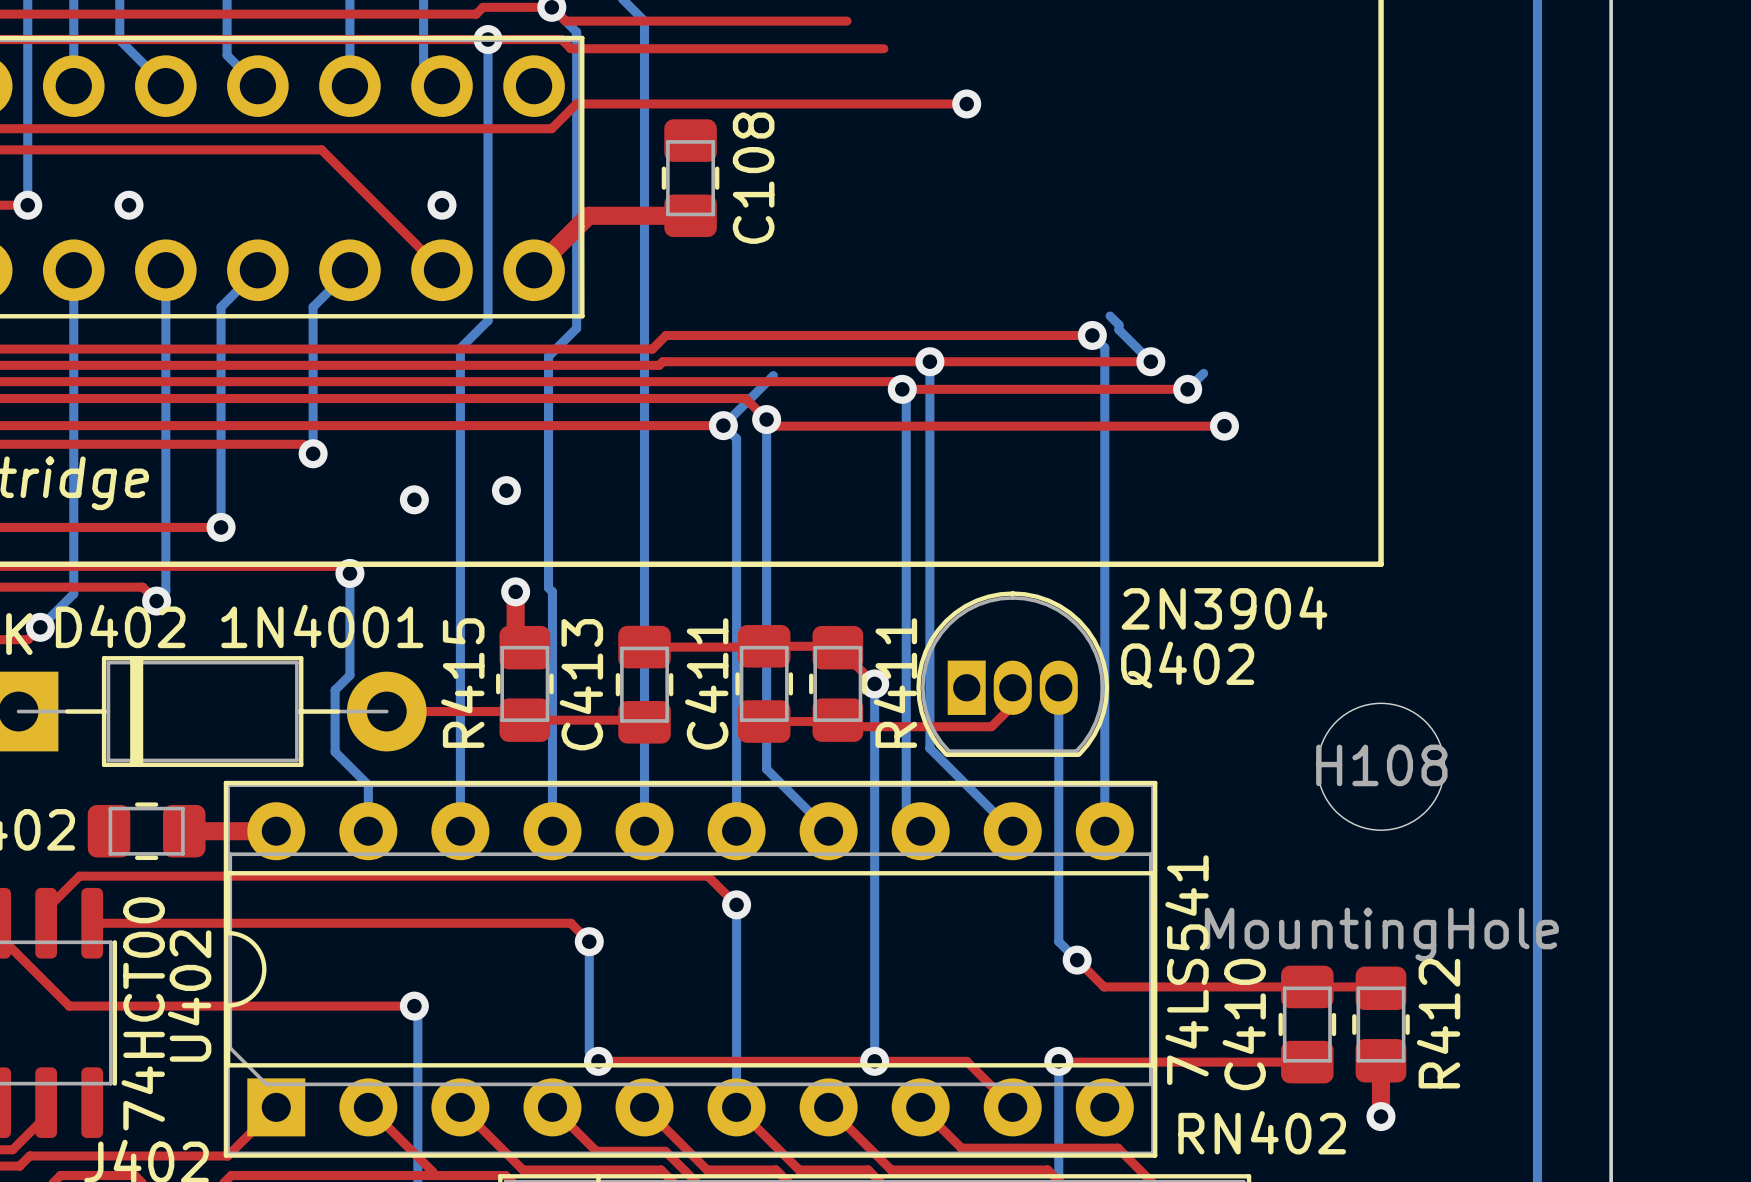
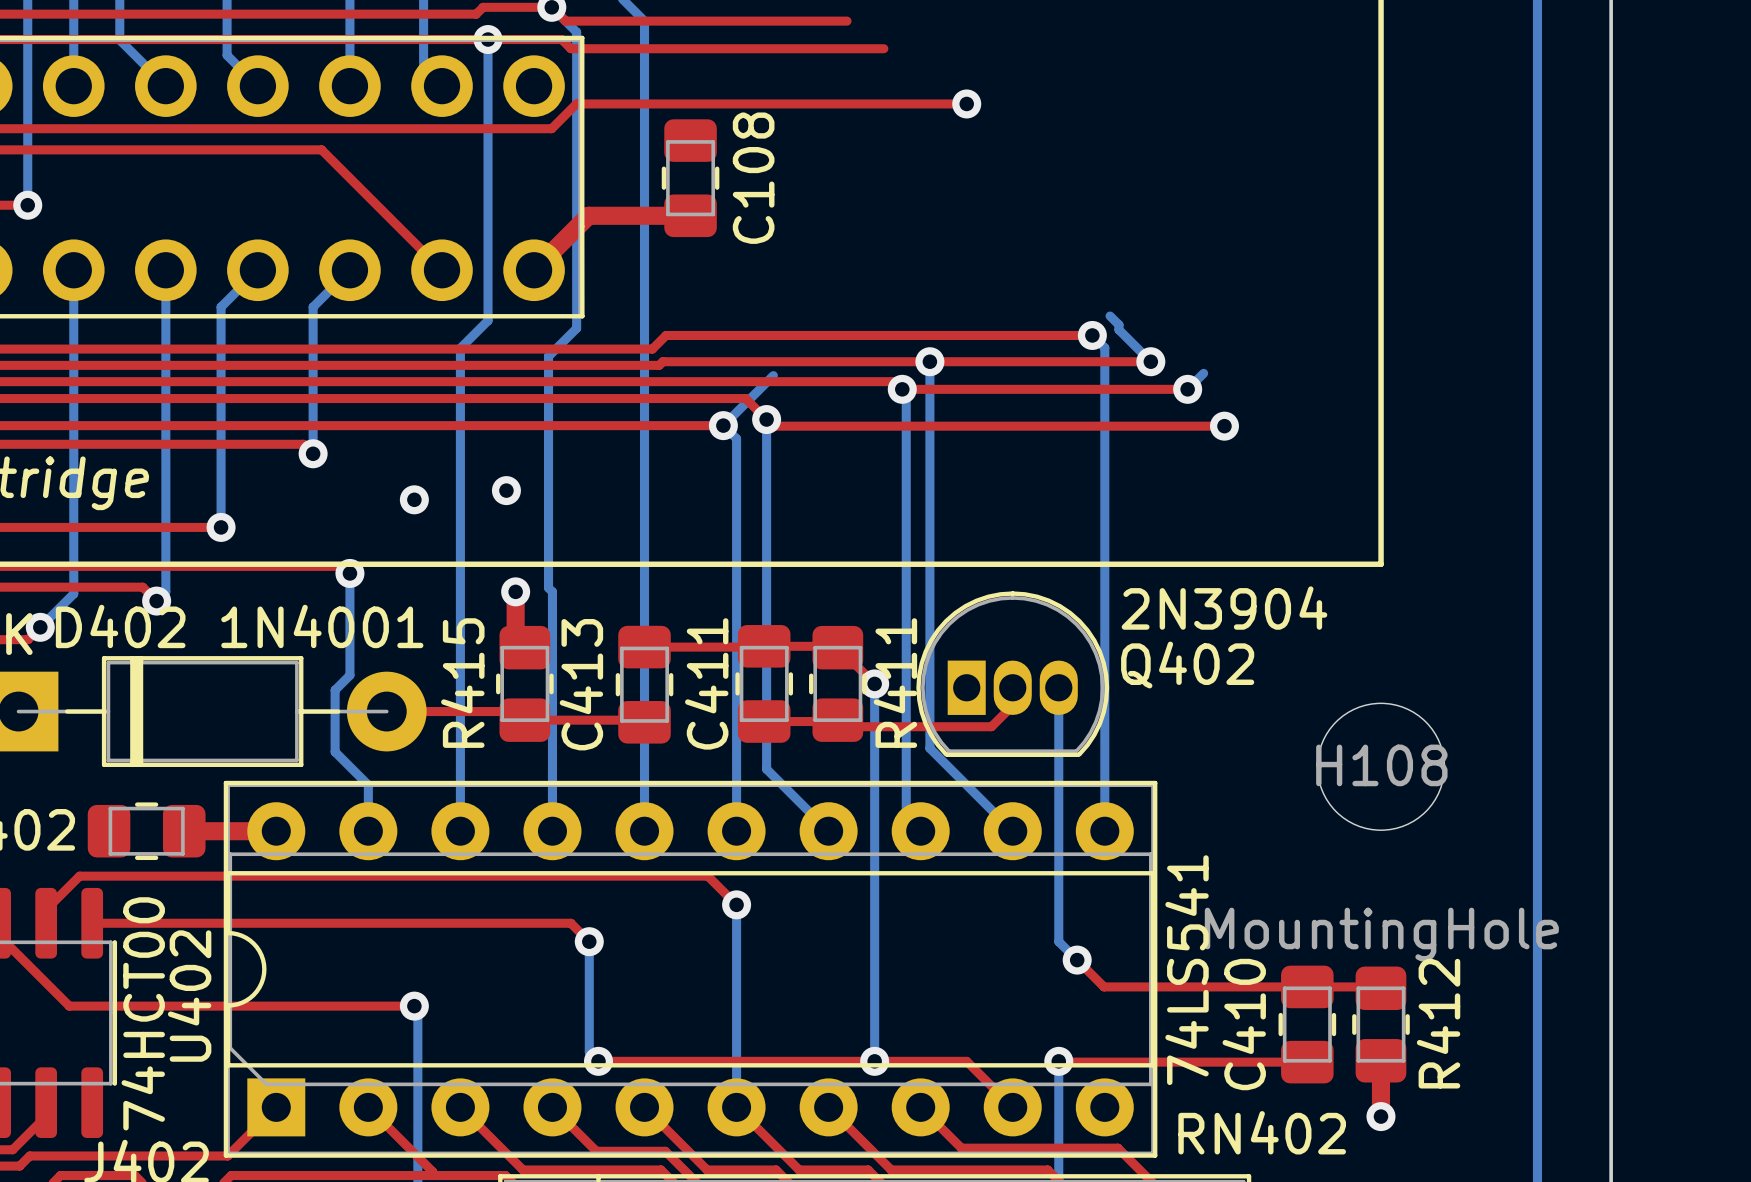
via: (129, 205) -> none
via: (442, 205) -> none

